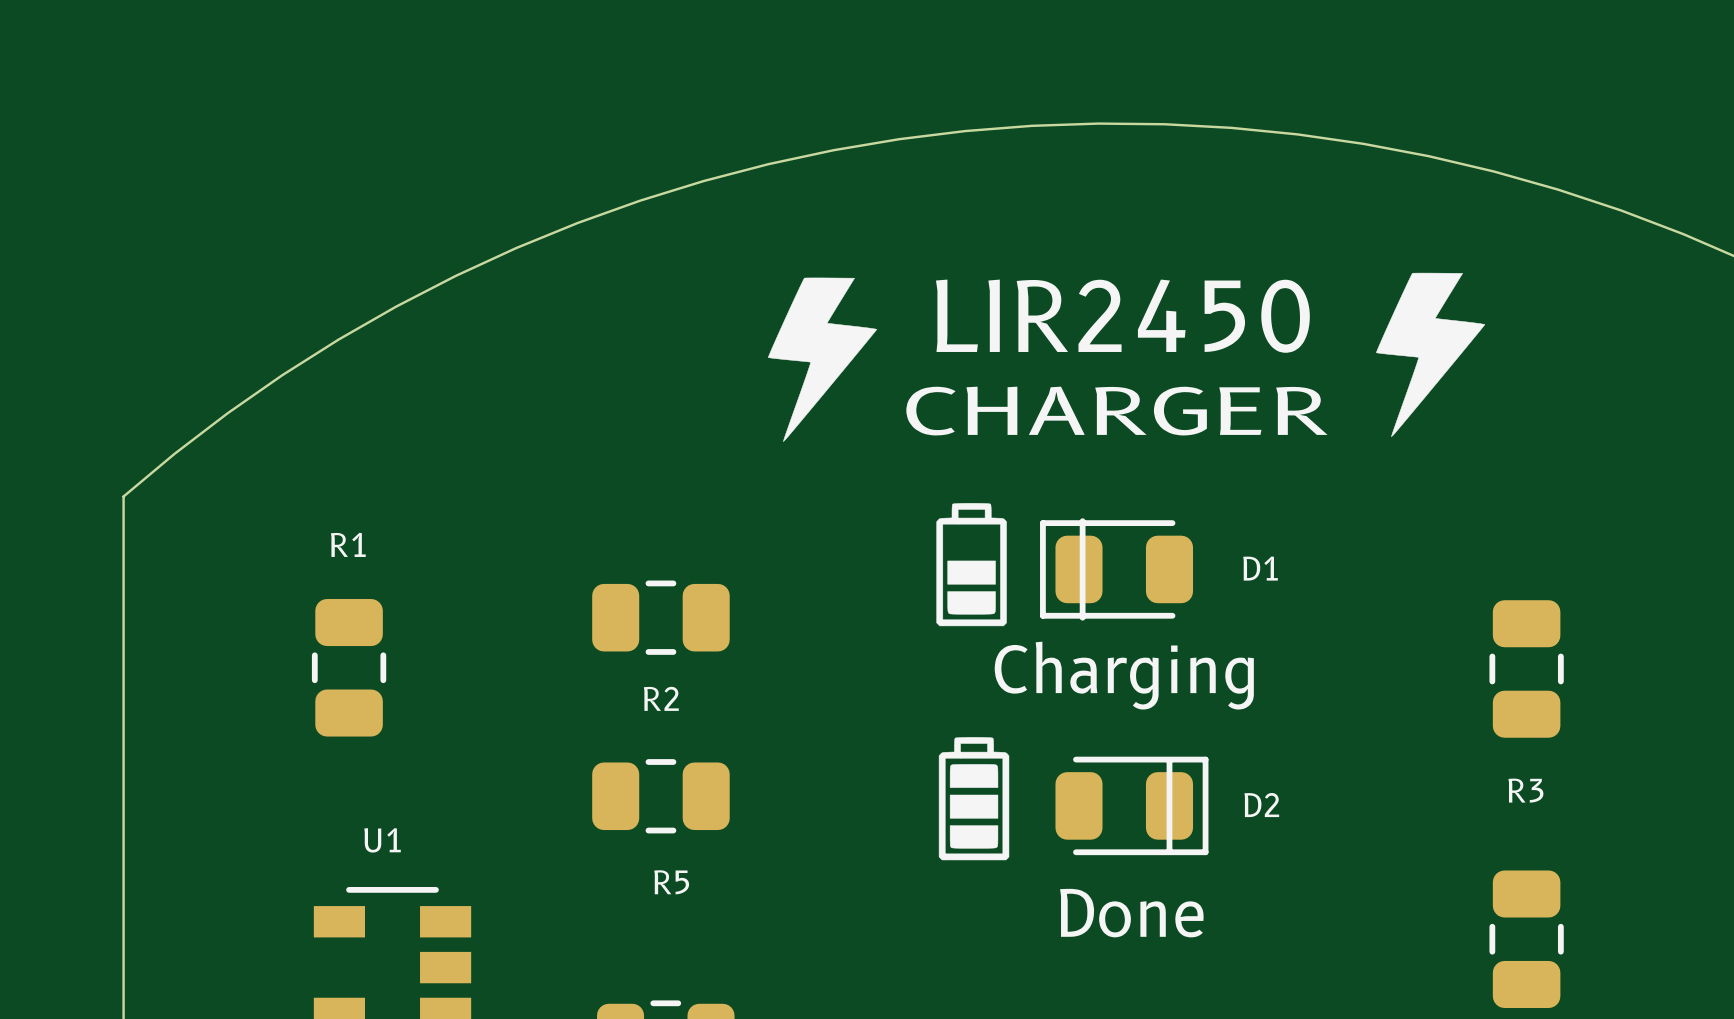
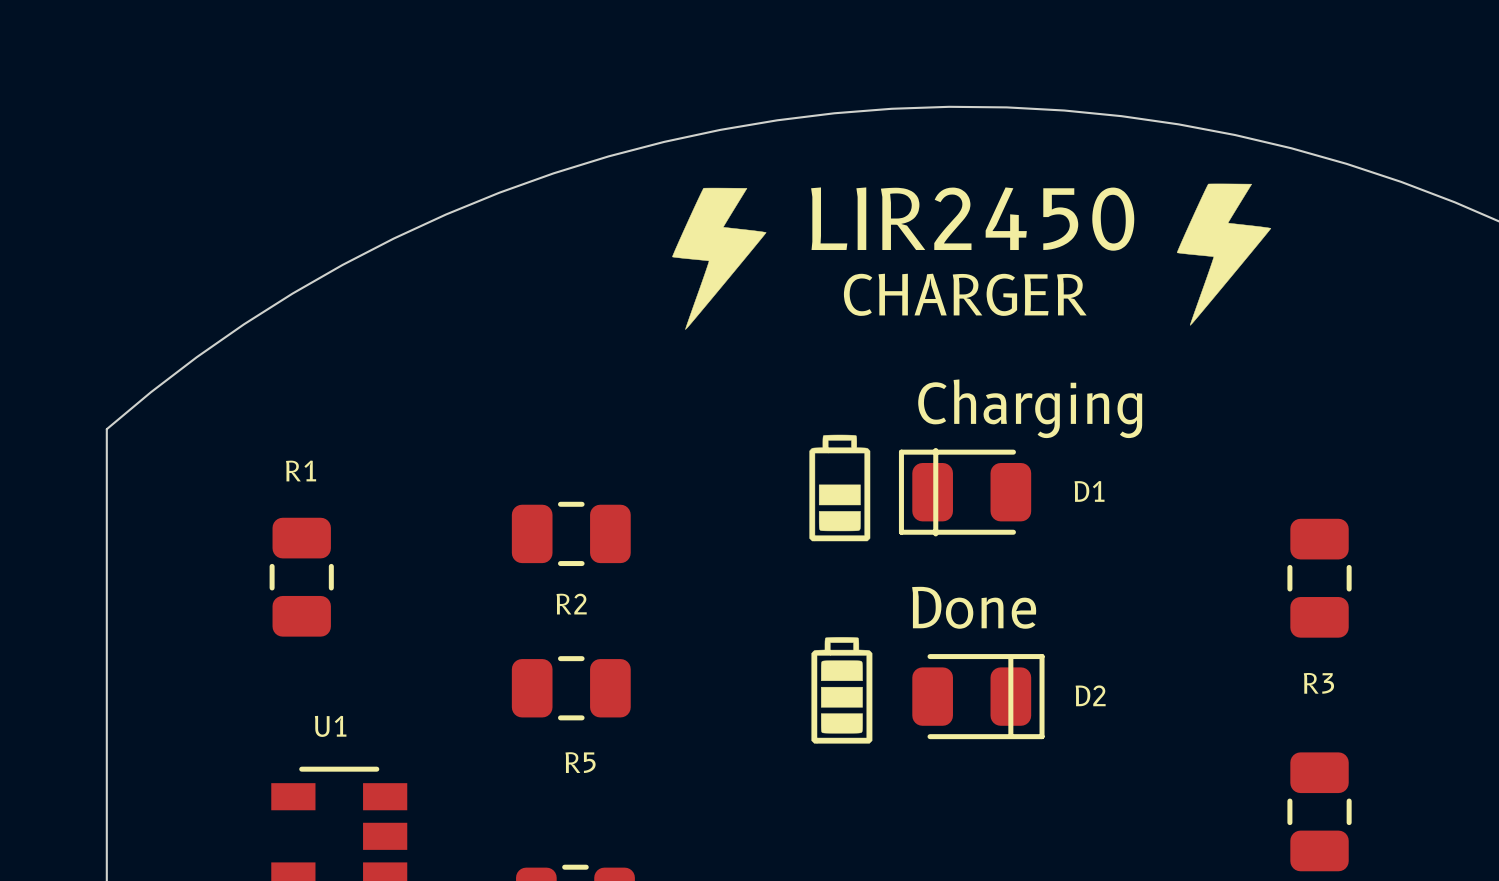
text: none -> LIR2450 (972, 219)
text: LIR2450 (1122, 316) -> CHARGER (965, 294)
drawing position: (1430, 354) -> (1224, 254)
drawing position: (822, 359) -> (719, 258)
text: CHARGER (1116, 411) -> none
text: none -> Charging (1030, 408)
text: Charging (1124, 675) -> Done (974, 607)
text: Done (1131, 913) -> none

